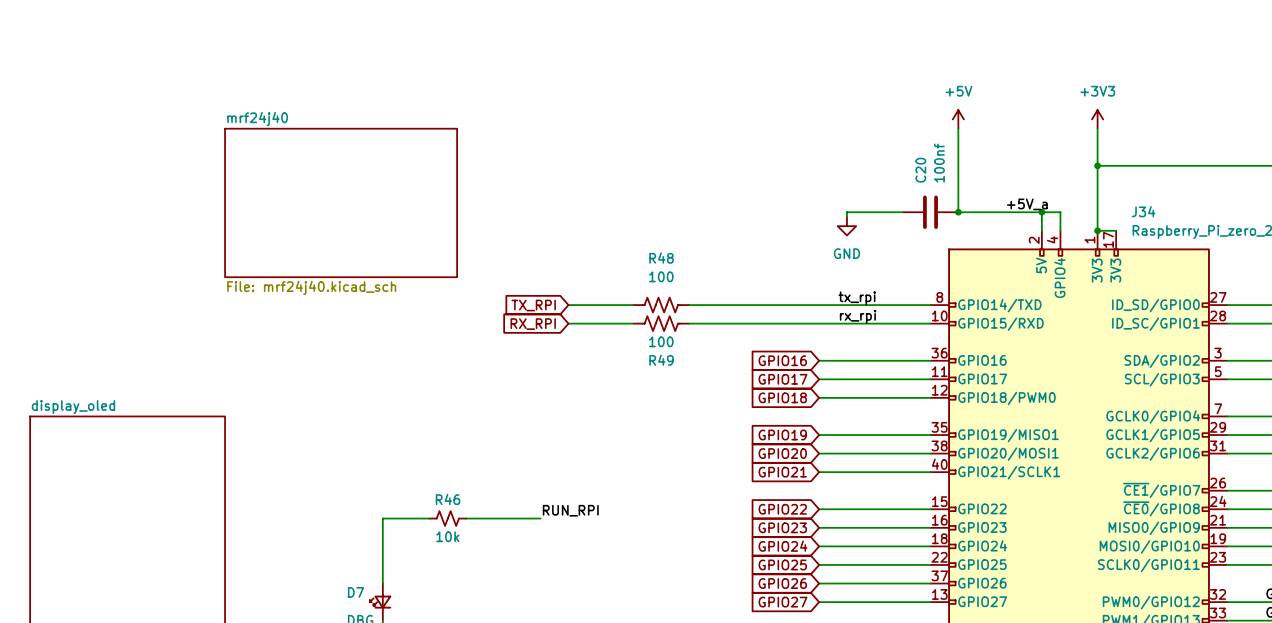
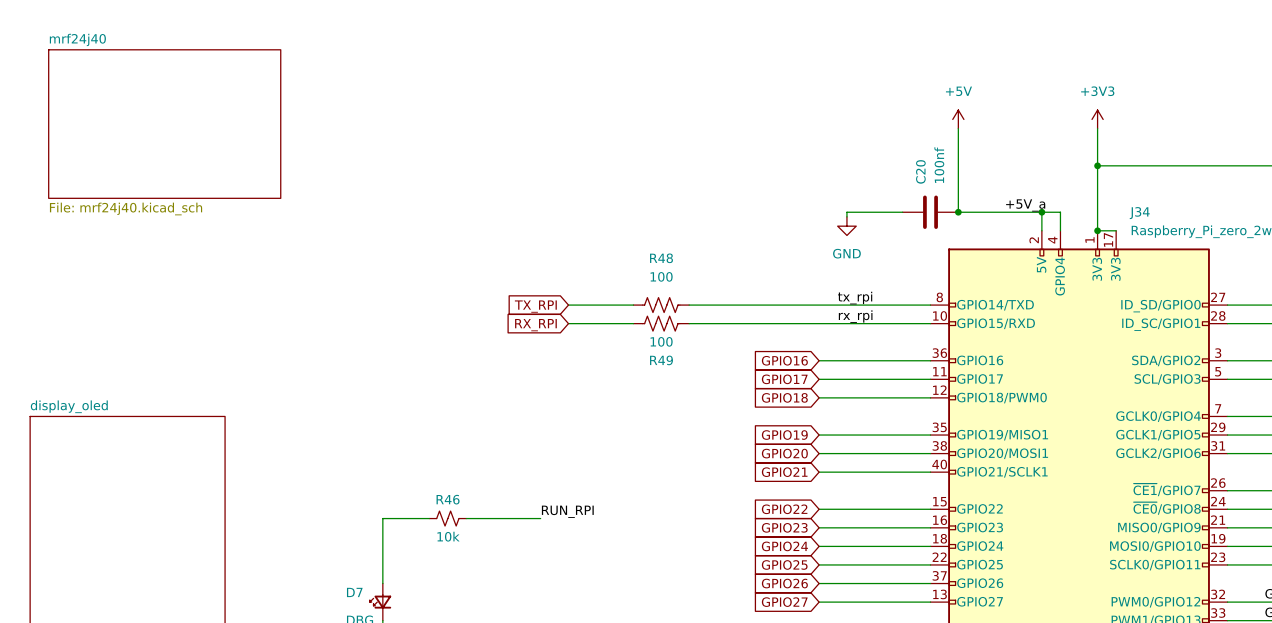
sheet mrf24j40 position: (341, 202) -> (164, 124)

